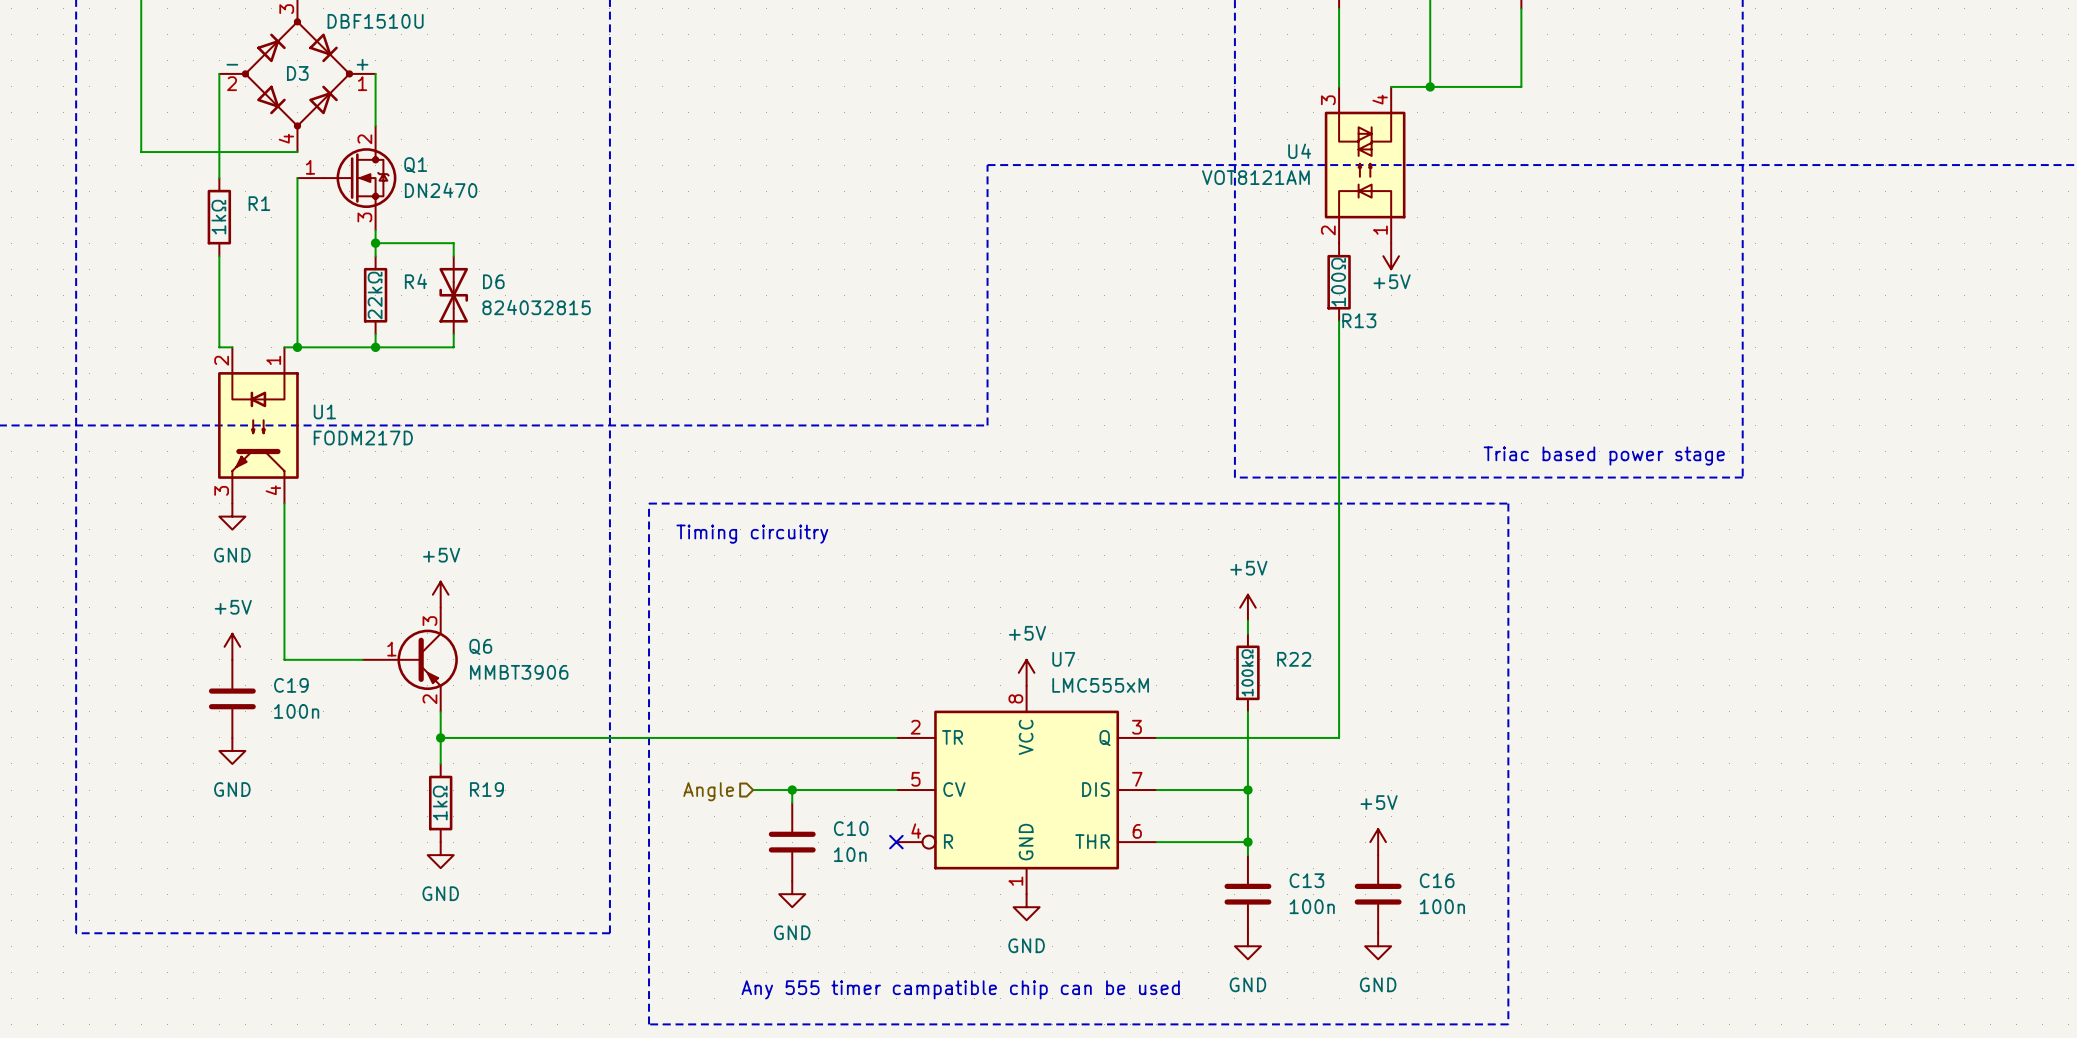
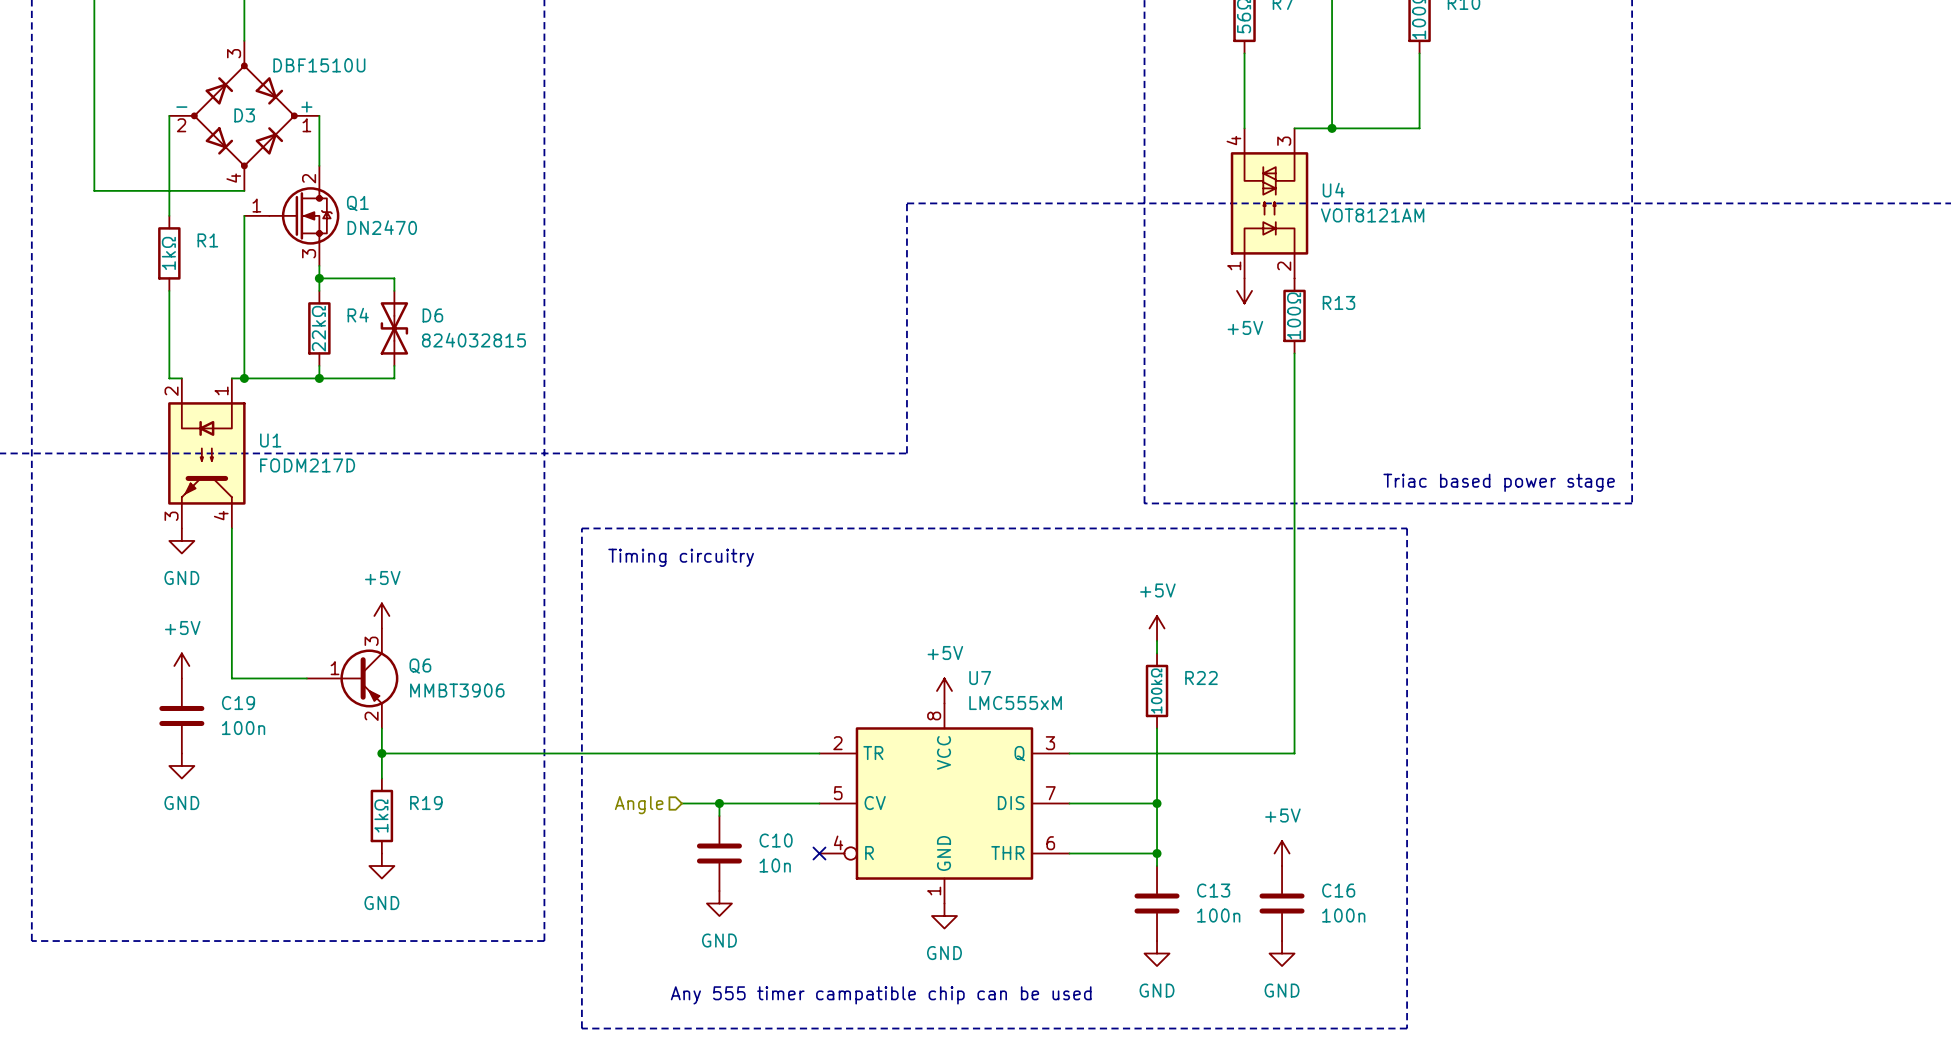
U4 flip: as is (1365, 165) -> left-right (1269, 203)
power symbol position: +5V (1391, 256) -> +5V (1244, 290)
power symbol text position: +5V (1392, 281) -> +5V (1245, 327)
R13 position: (1339, 282) -> (1294, 315)
R13 name position: R13 (1359, 320) -> R13 (1338, 302)
wire: (1339, 321) (1339, 737) -> (1294, 353) (1294, 753) (1244, 753)

